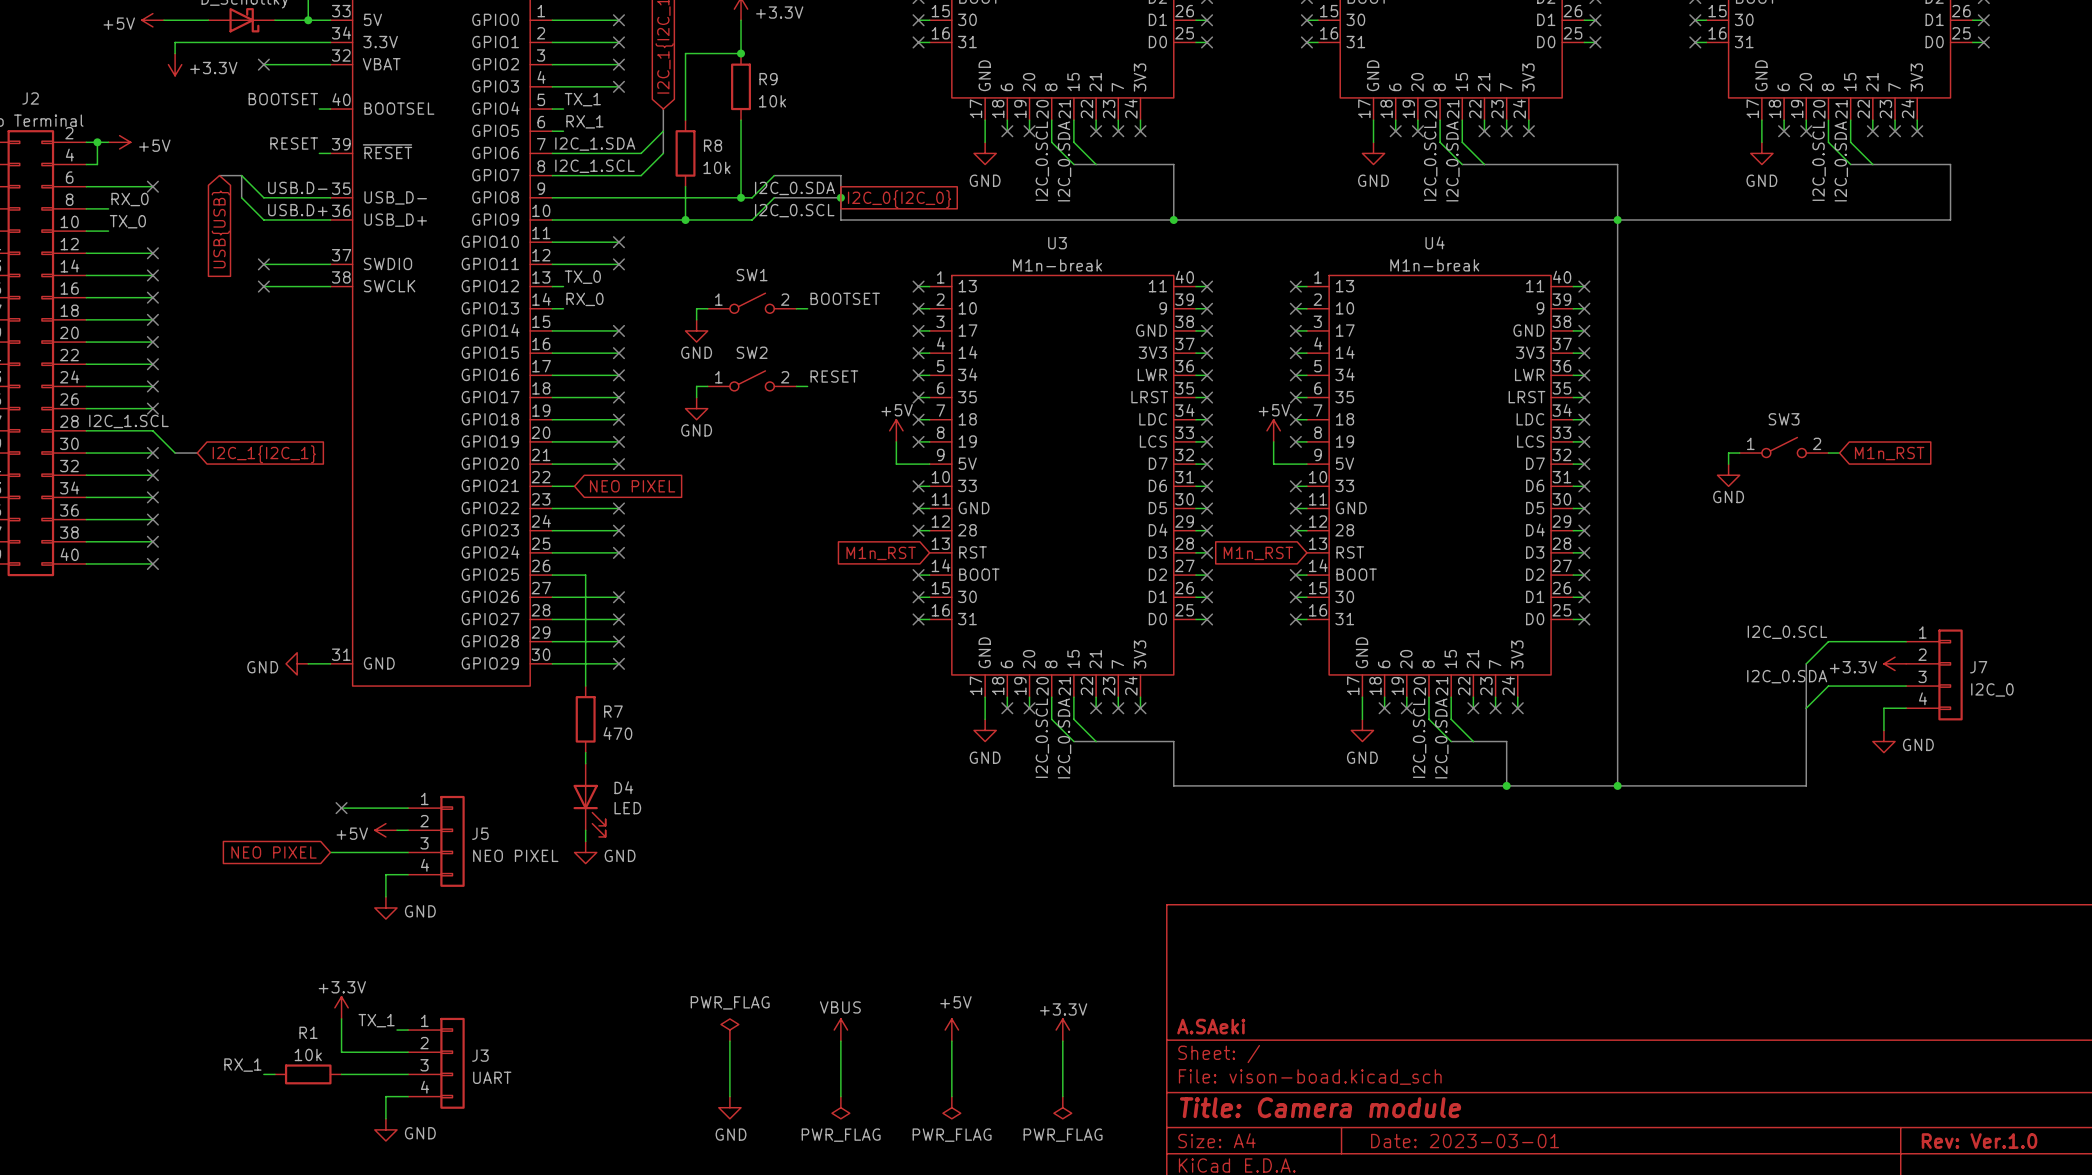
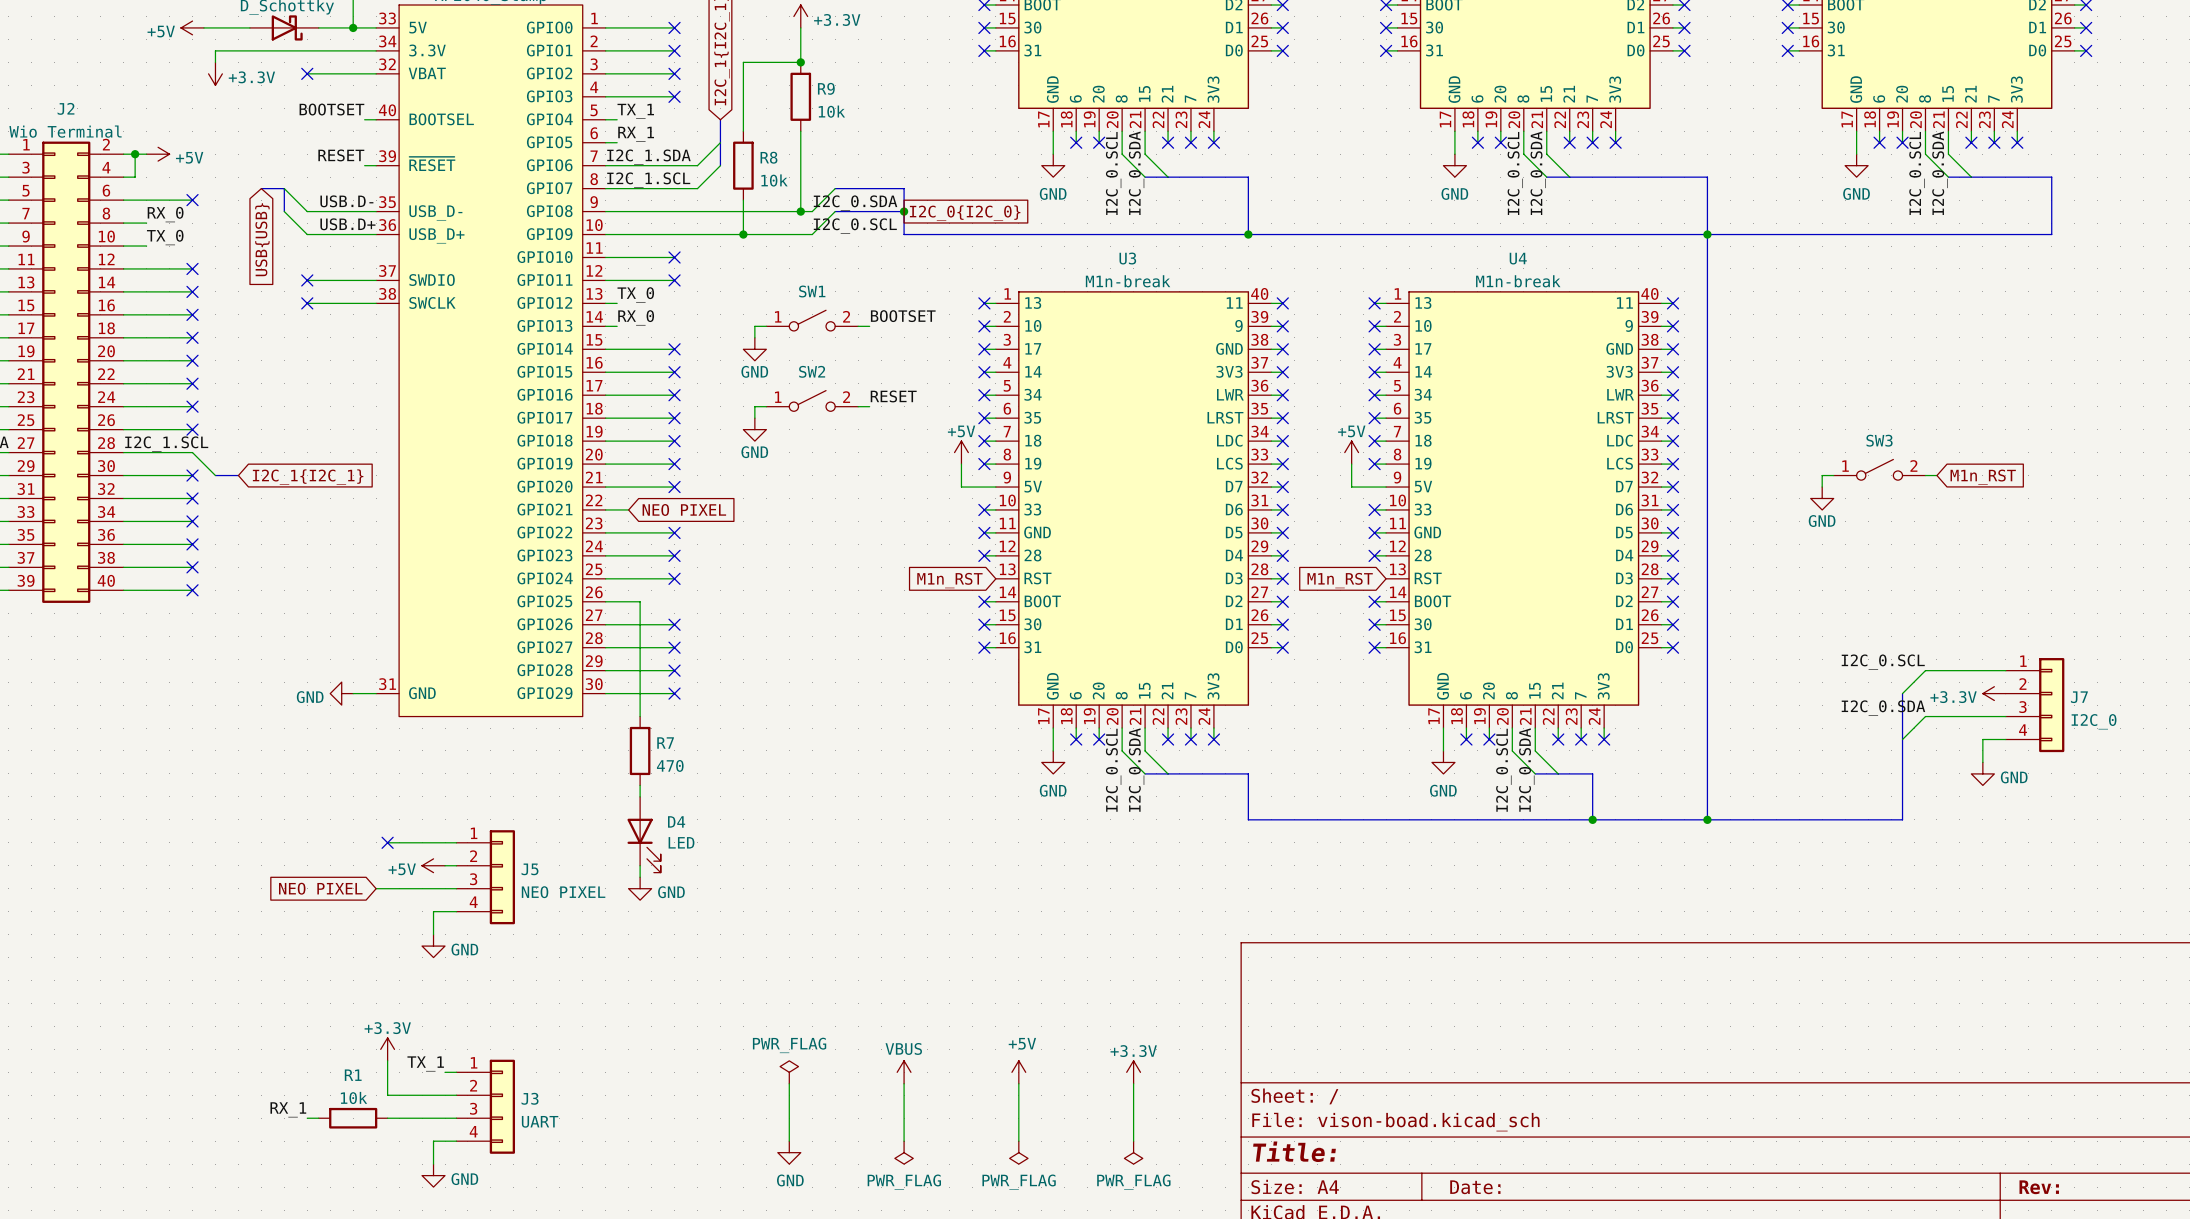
title block: A.SAeki (1211, 1026) -> none
title block: Title: Camera module (1320, 1107) -> Title: (1294, 1151)
title block: Date: 2023-03-01 (1465, 1141) -> Date: (1475, 1187)
title block: Rev: Ver.1.0 (1979, 1141) -> Rev: (2039, 1187)

